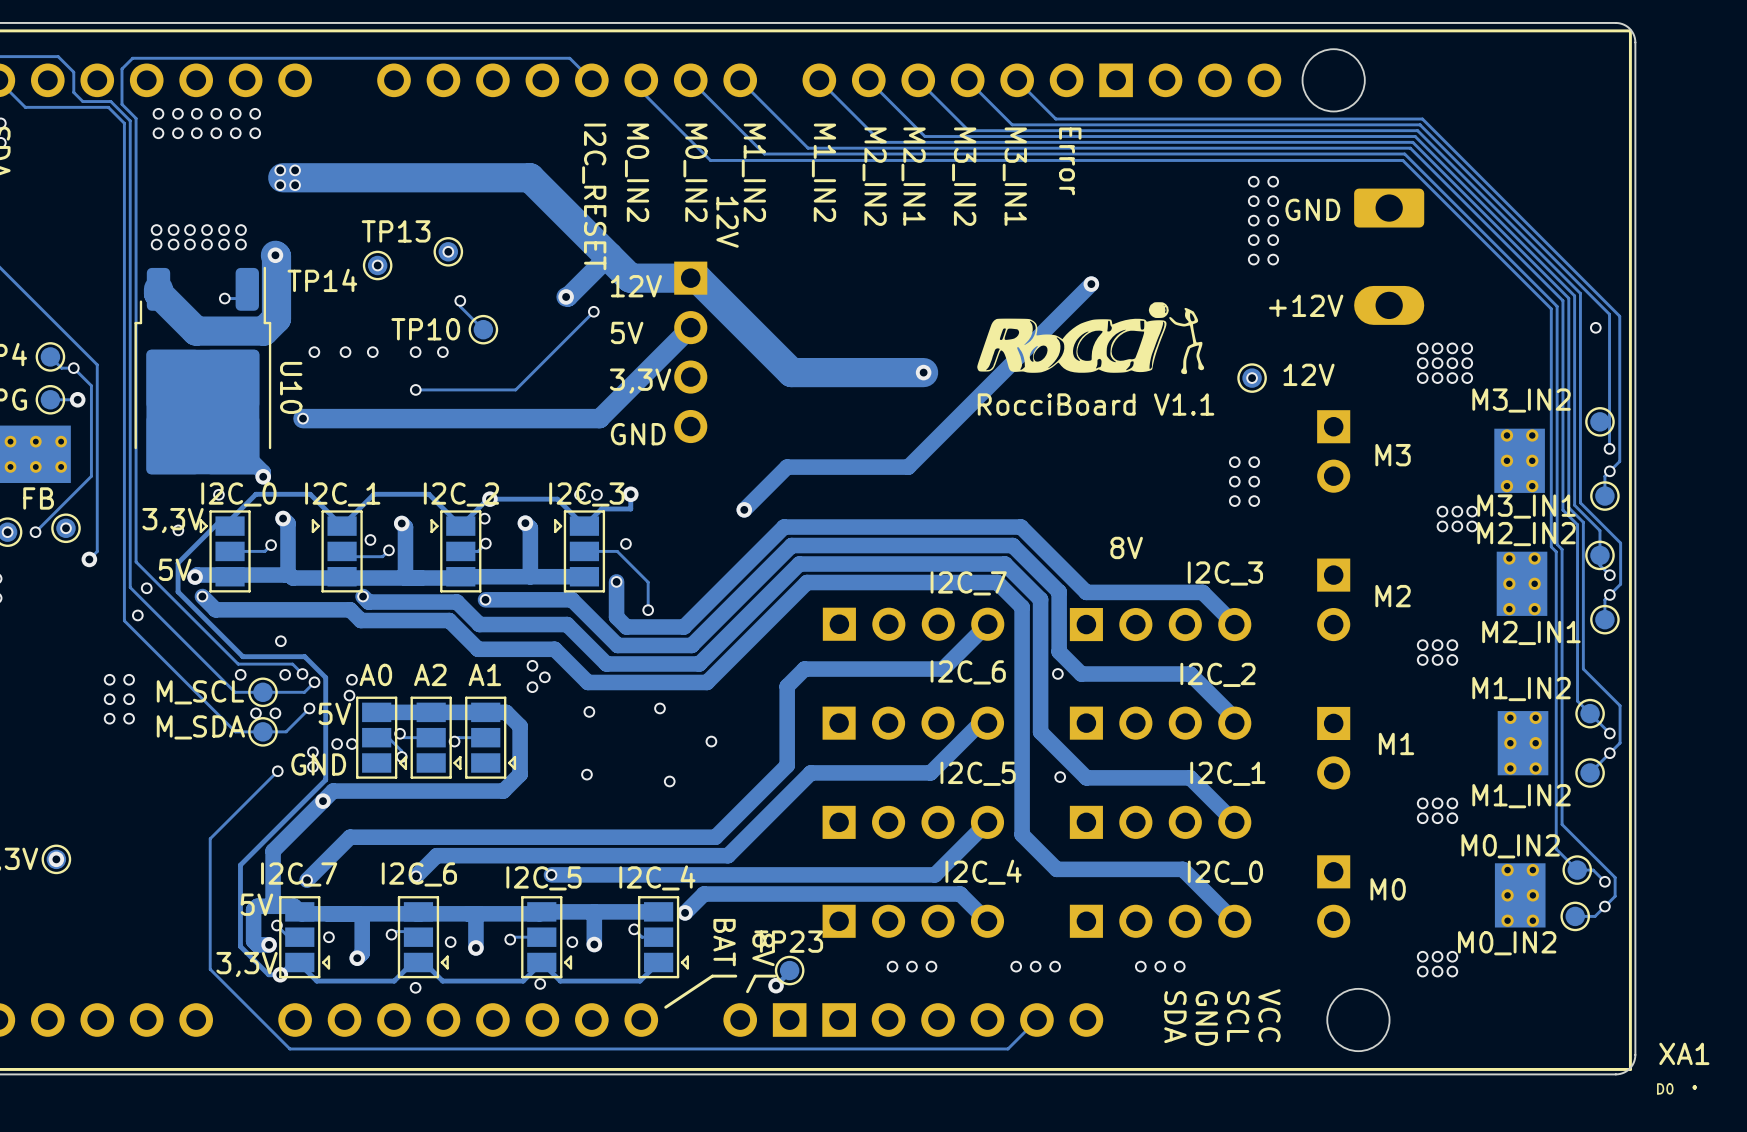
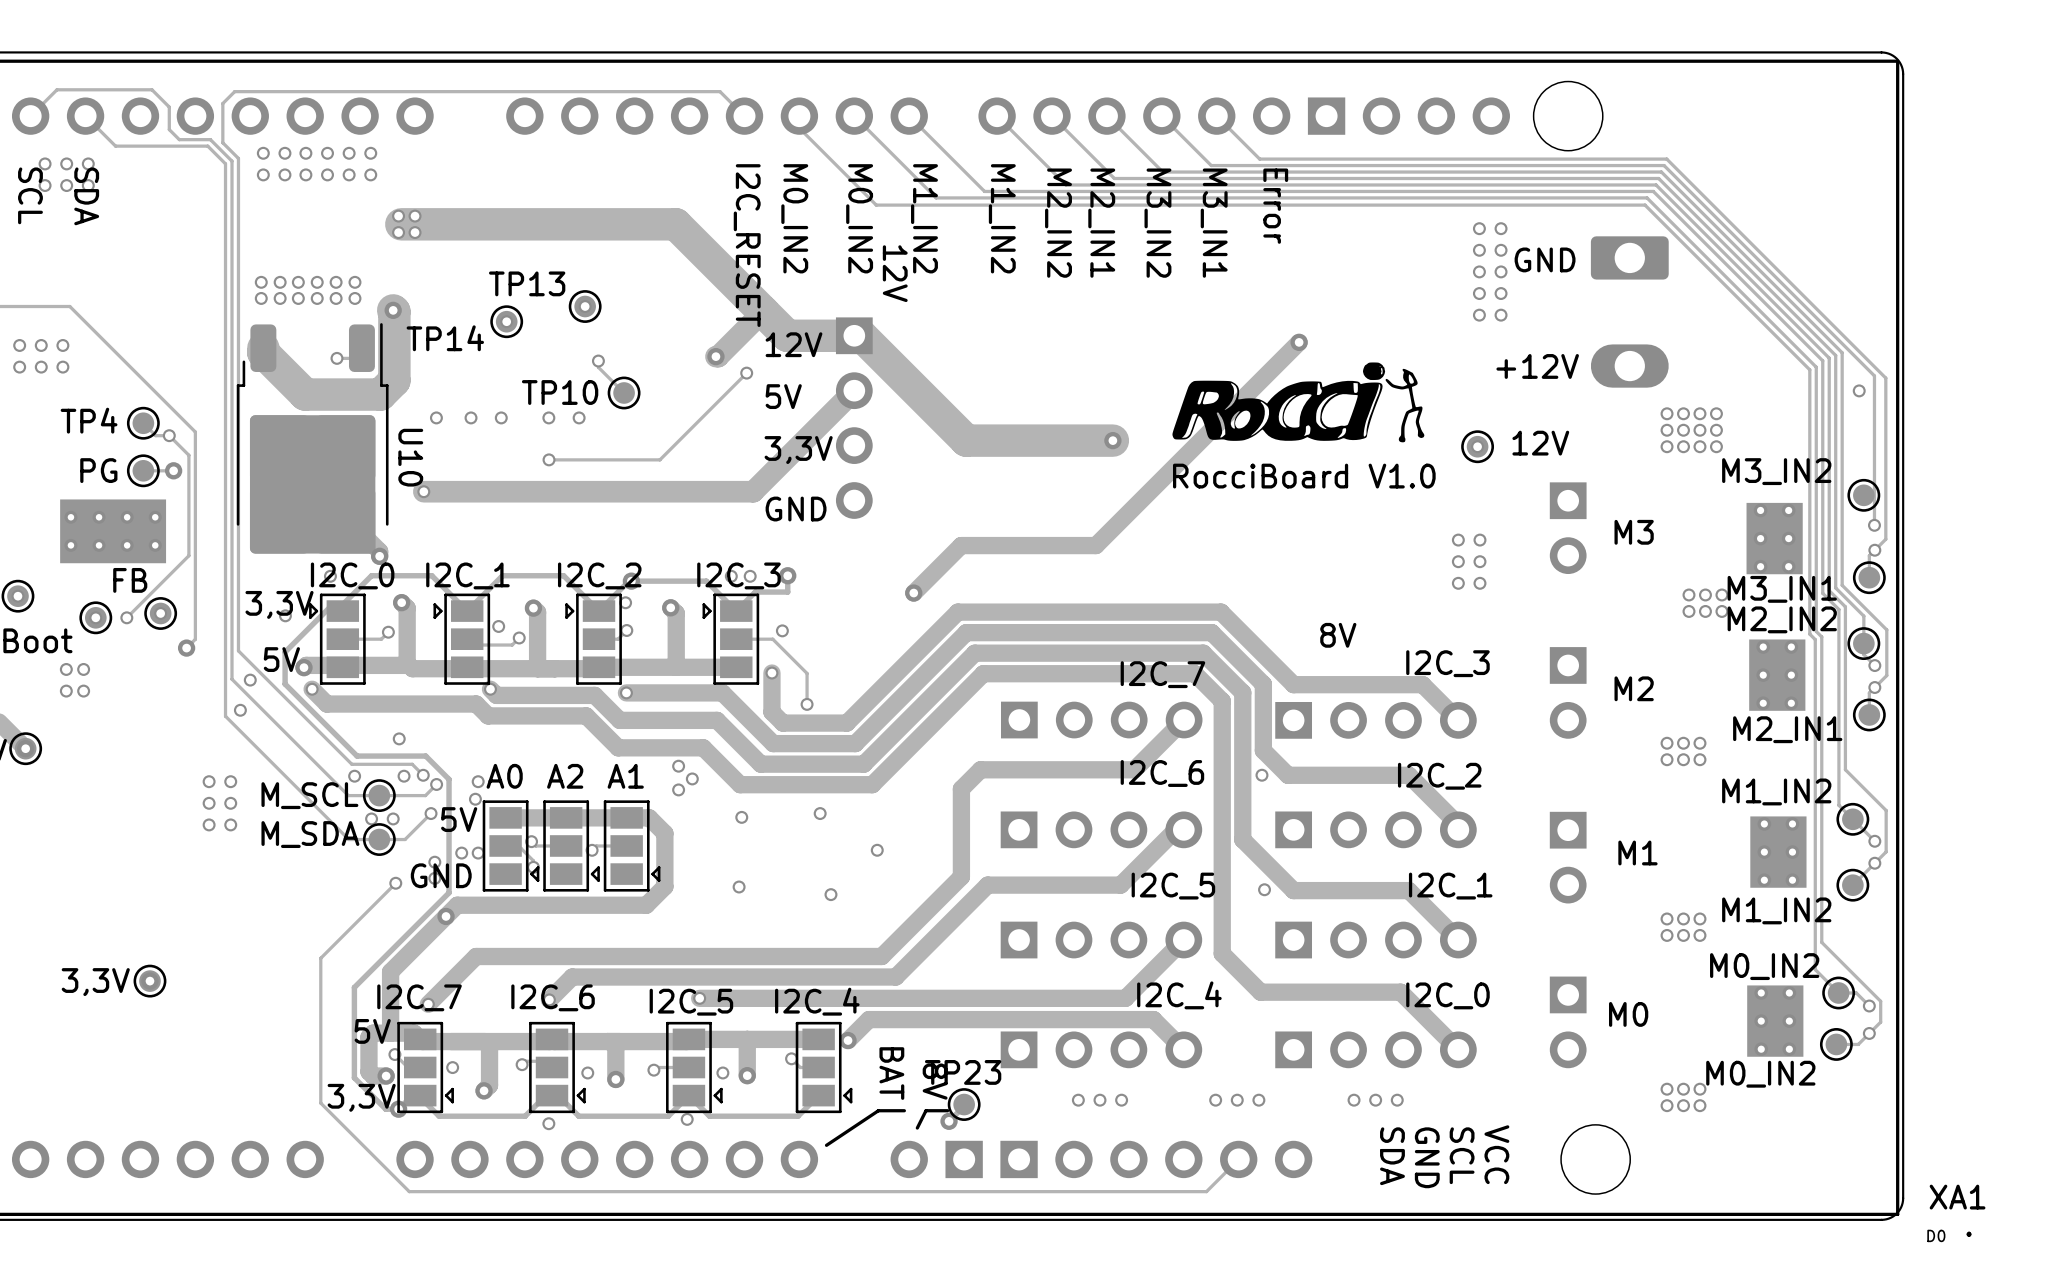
text: RocciBoard V1.1 (1096, 404) -> RocciBoard V1.0 (1304, 476)

